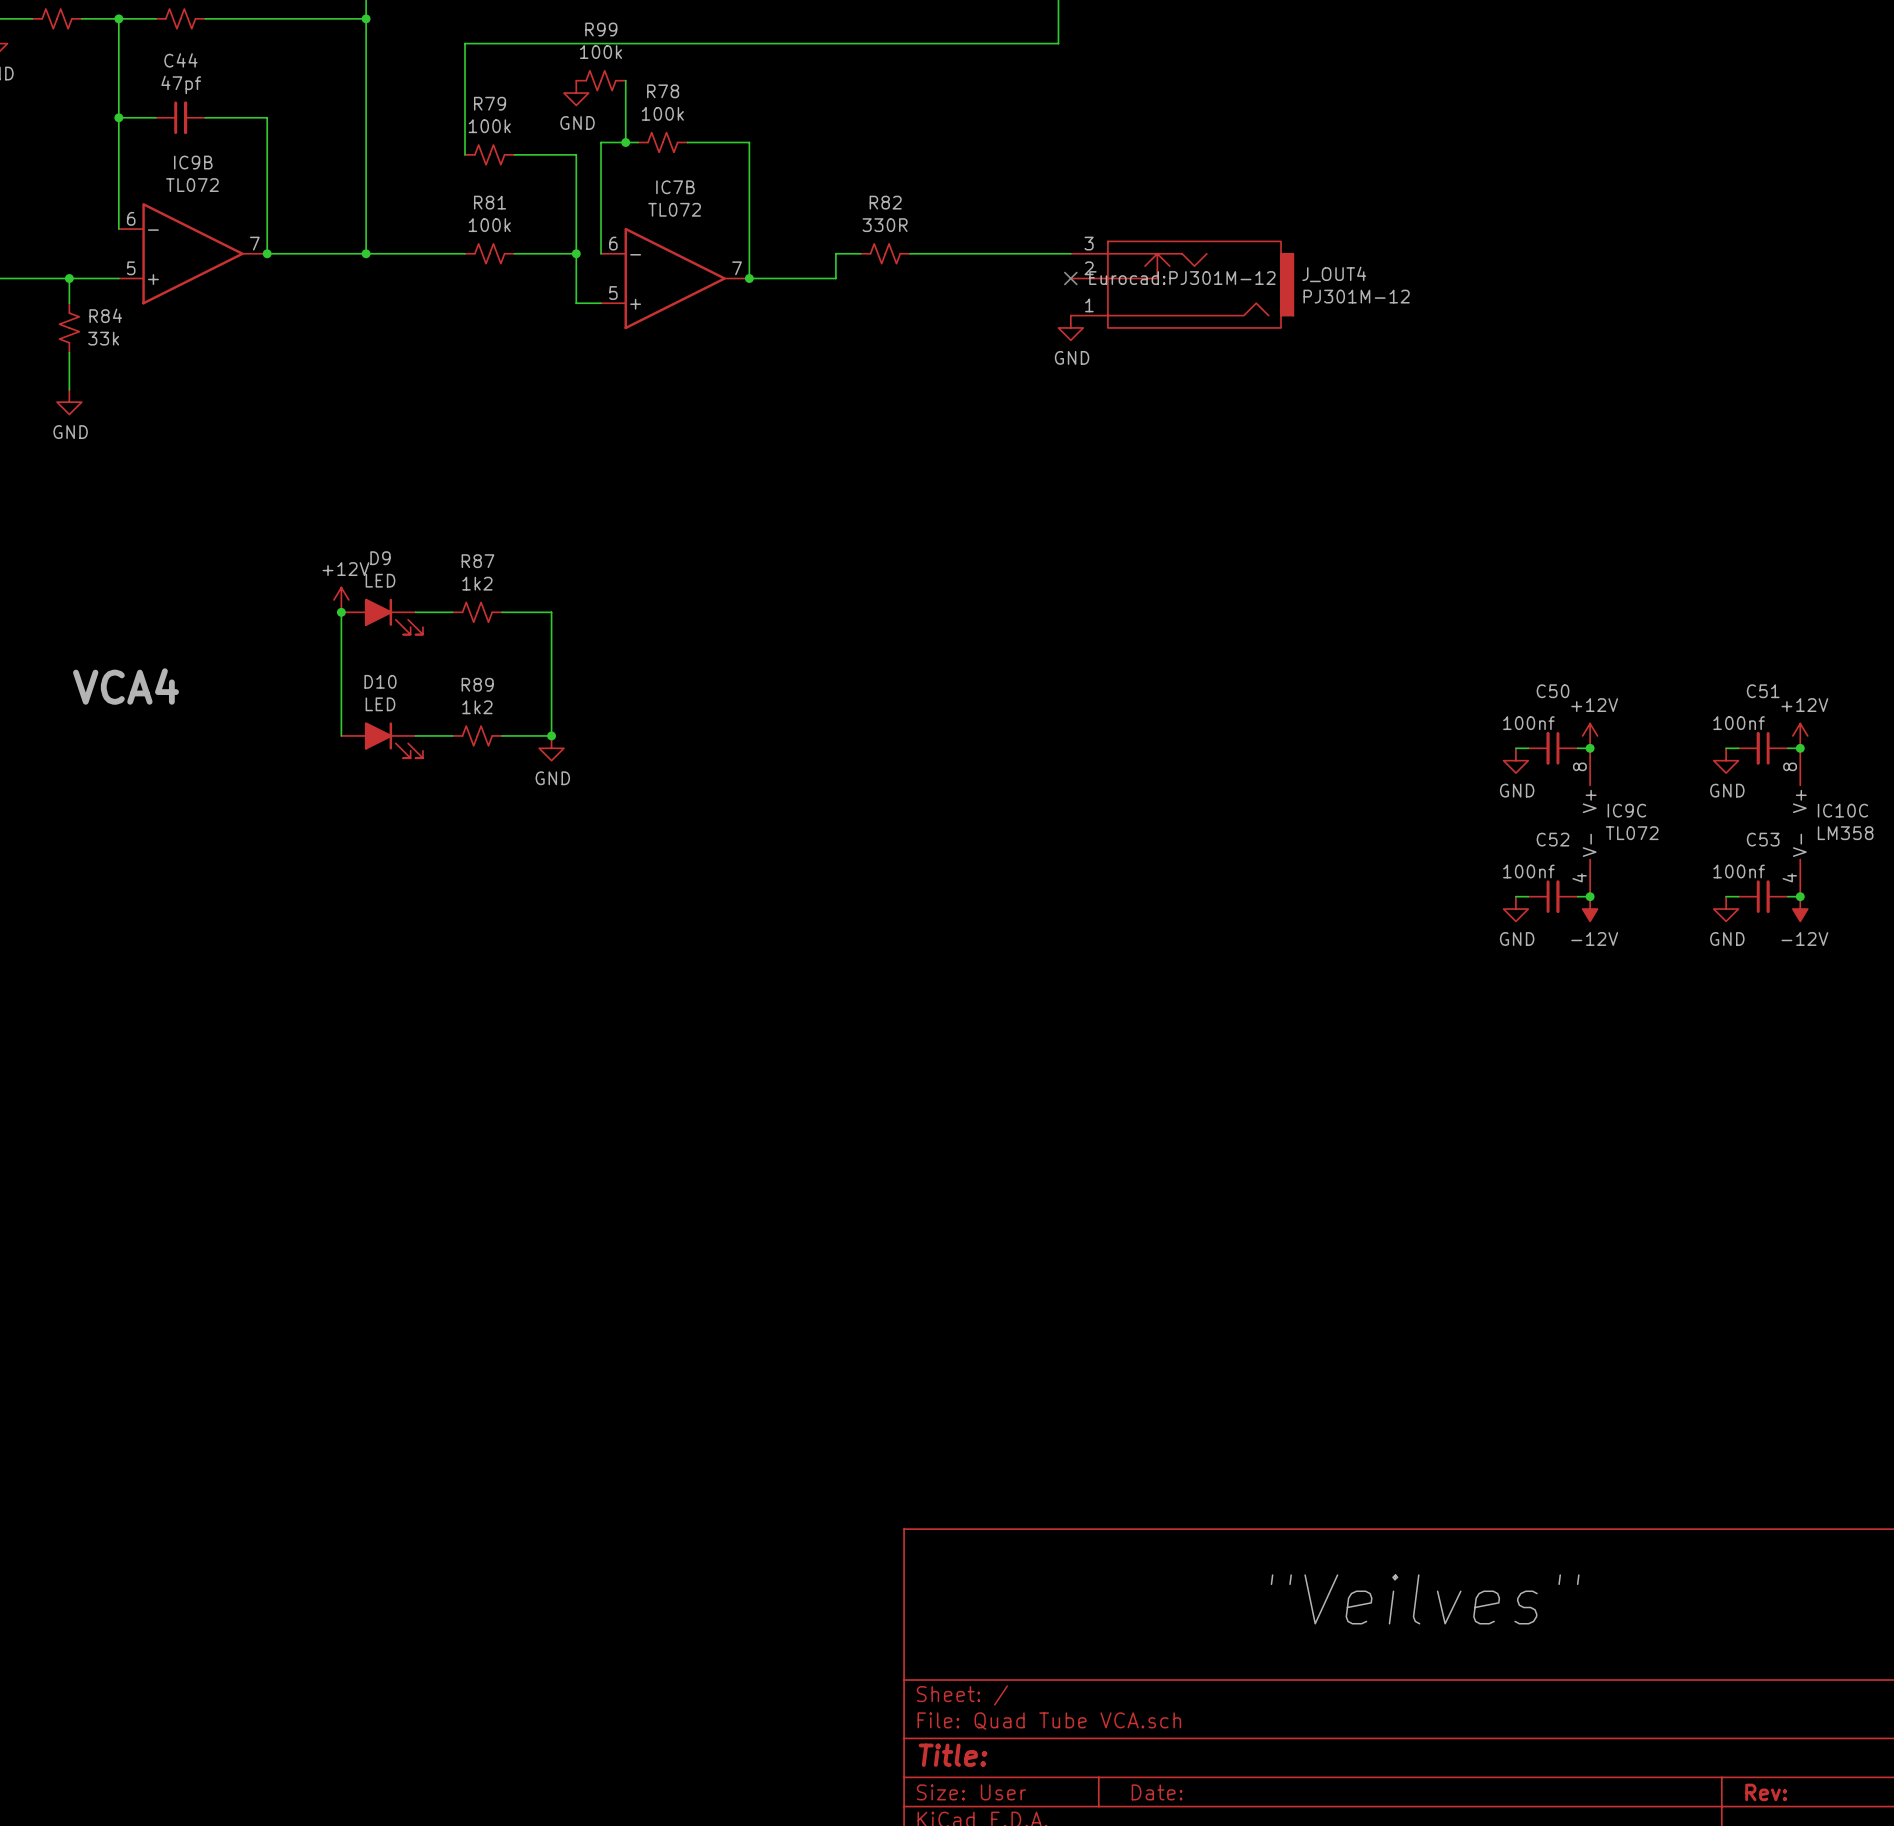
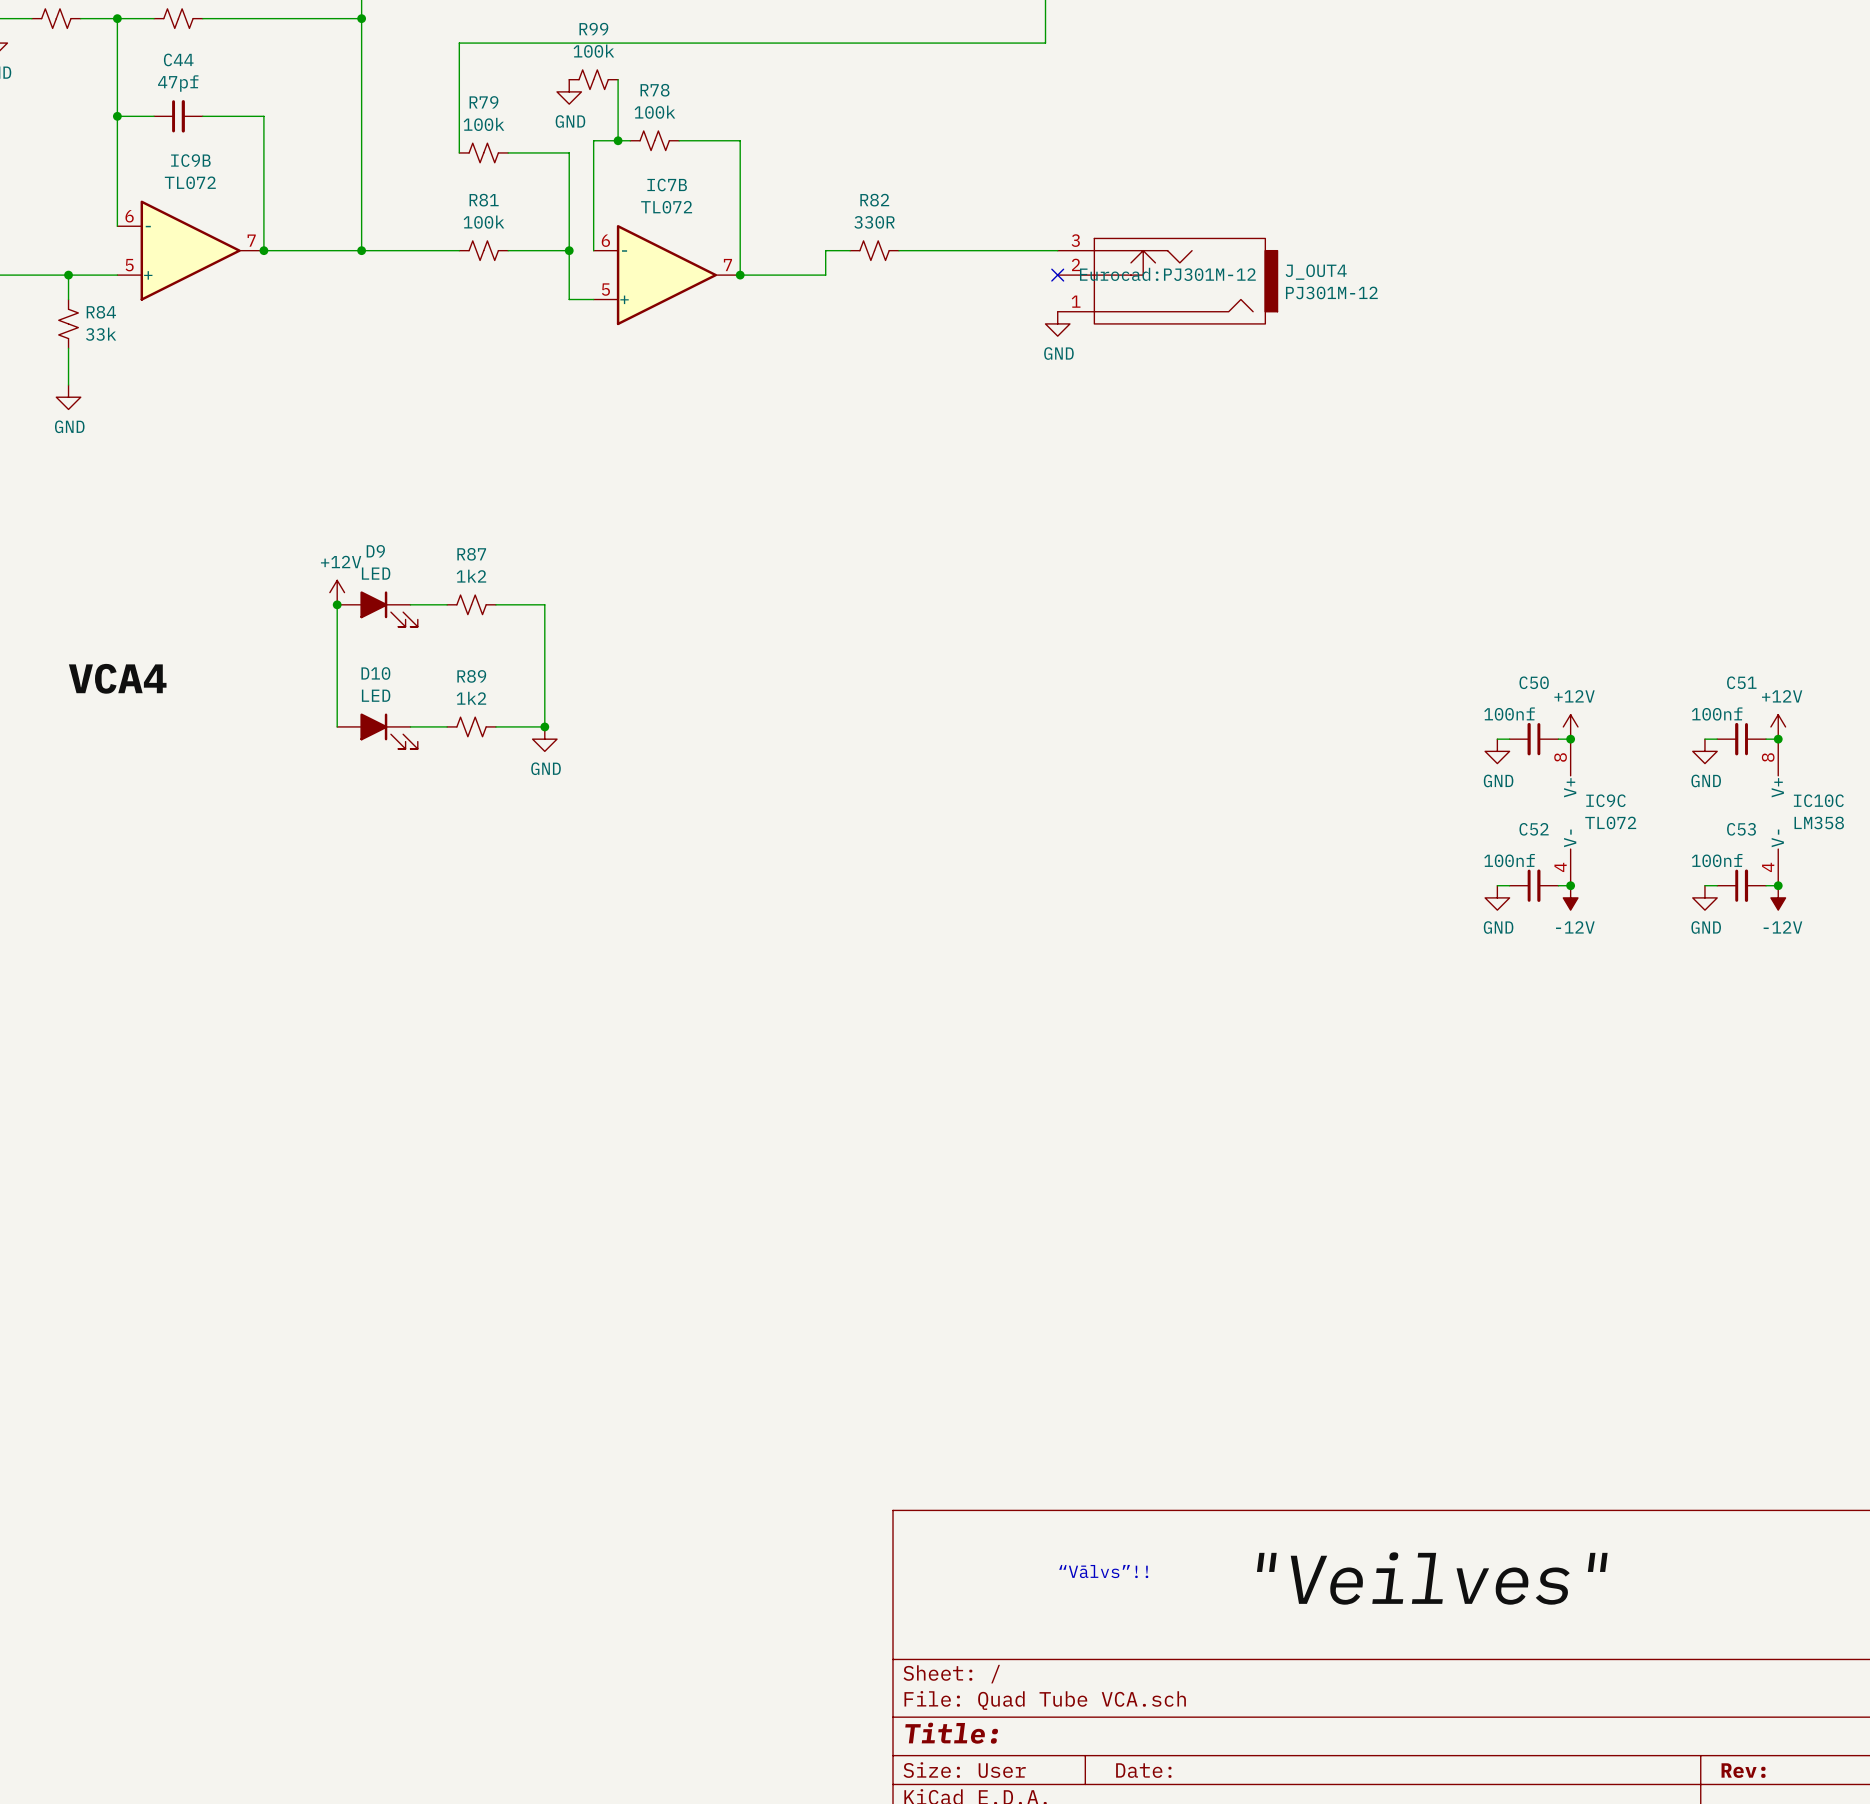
text: none -> “Vālvs”!! (1103, 1571)

